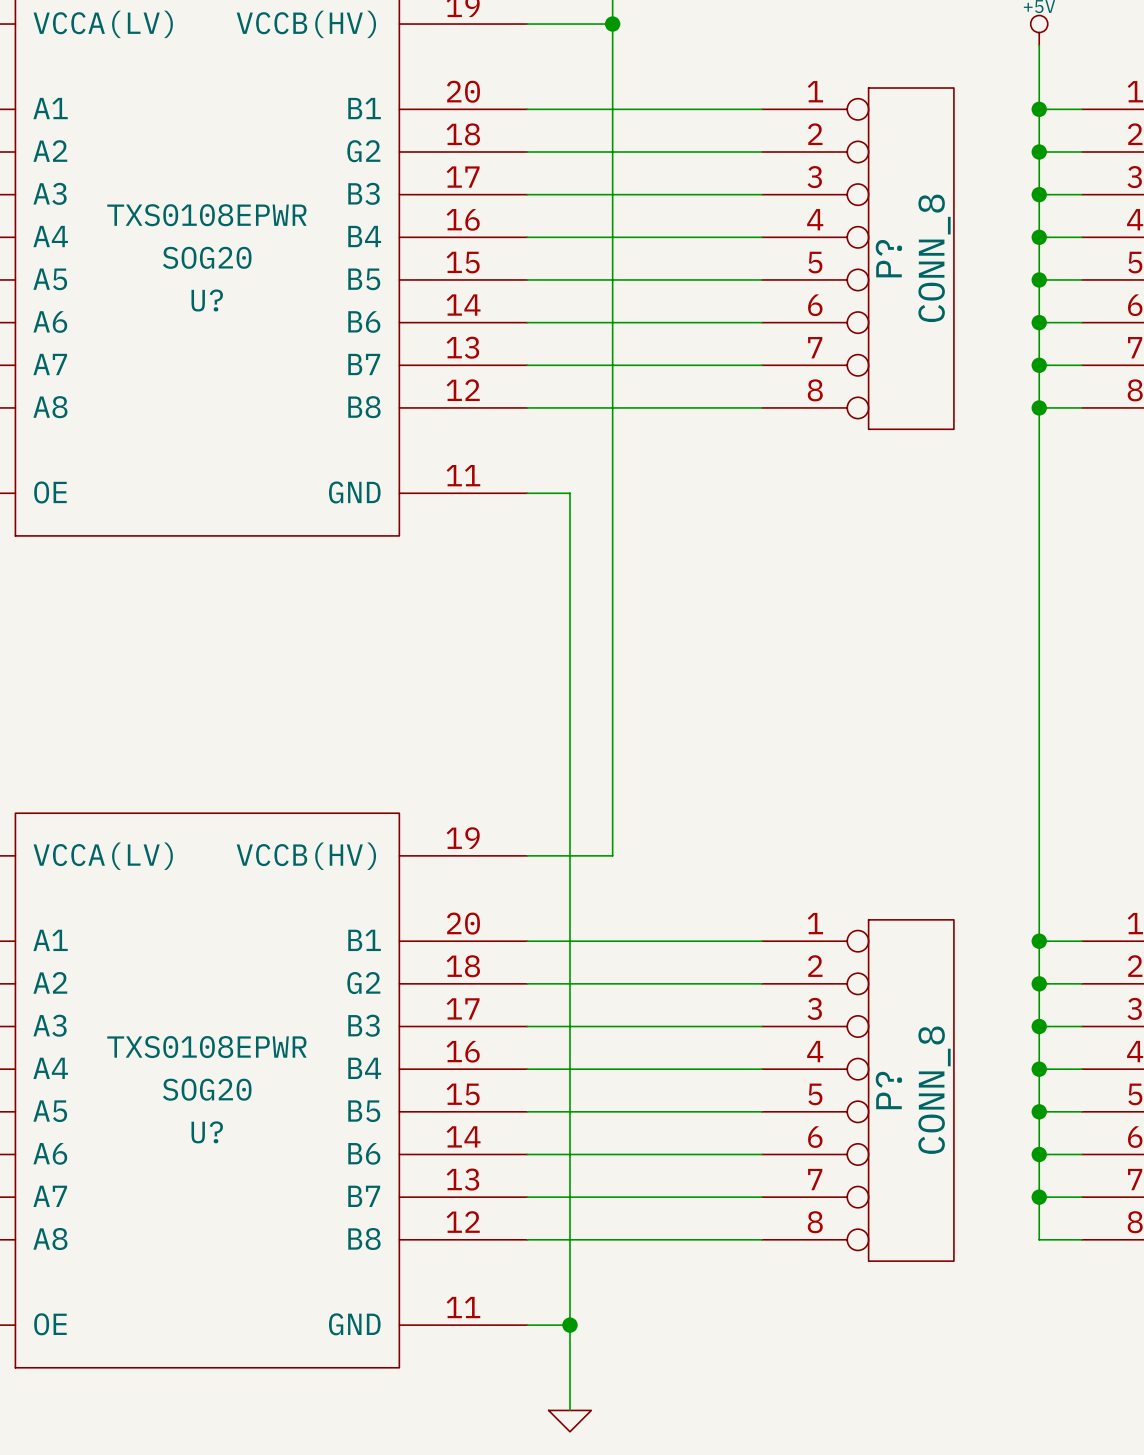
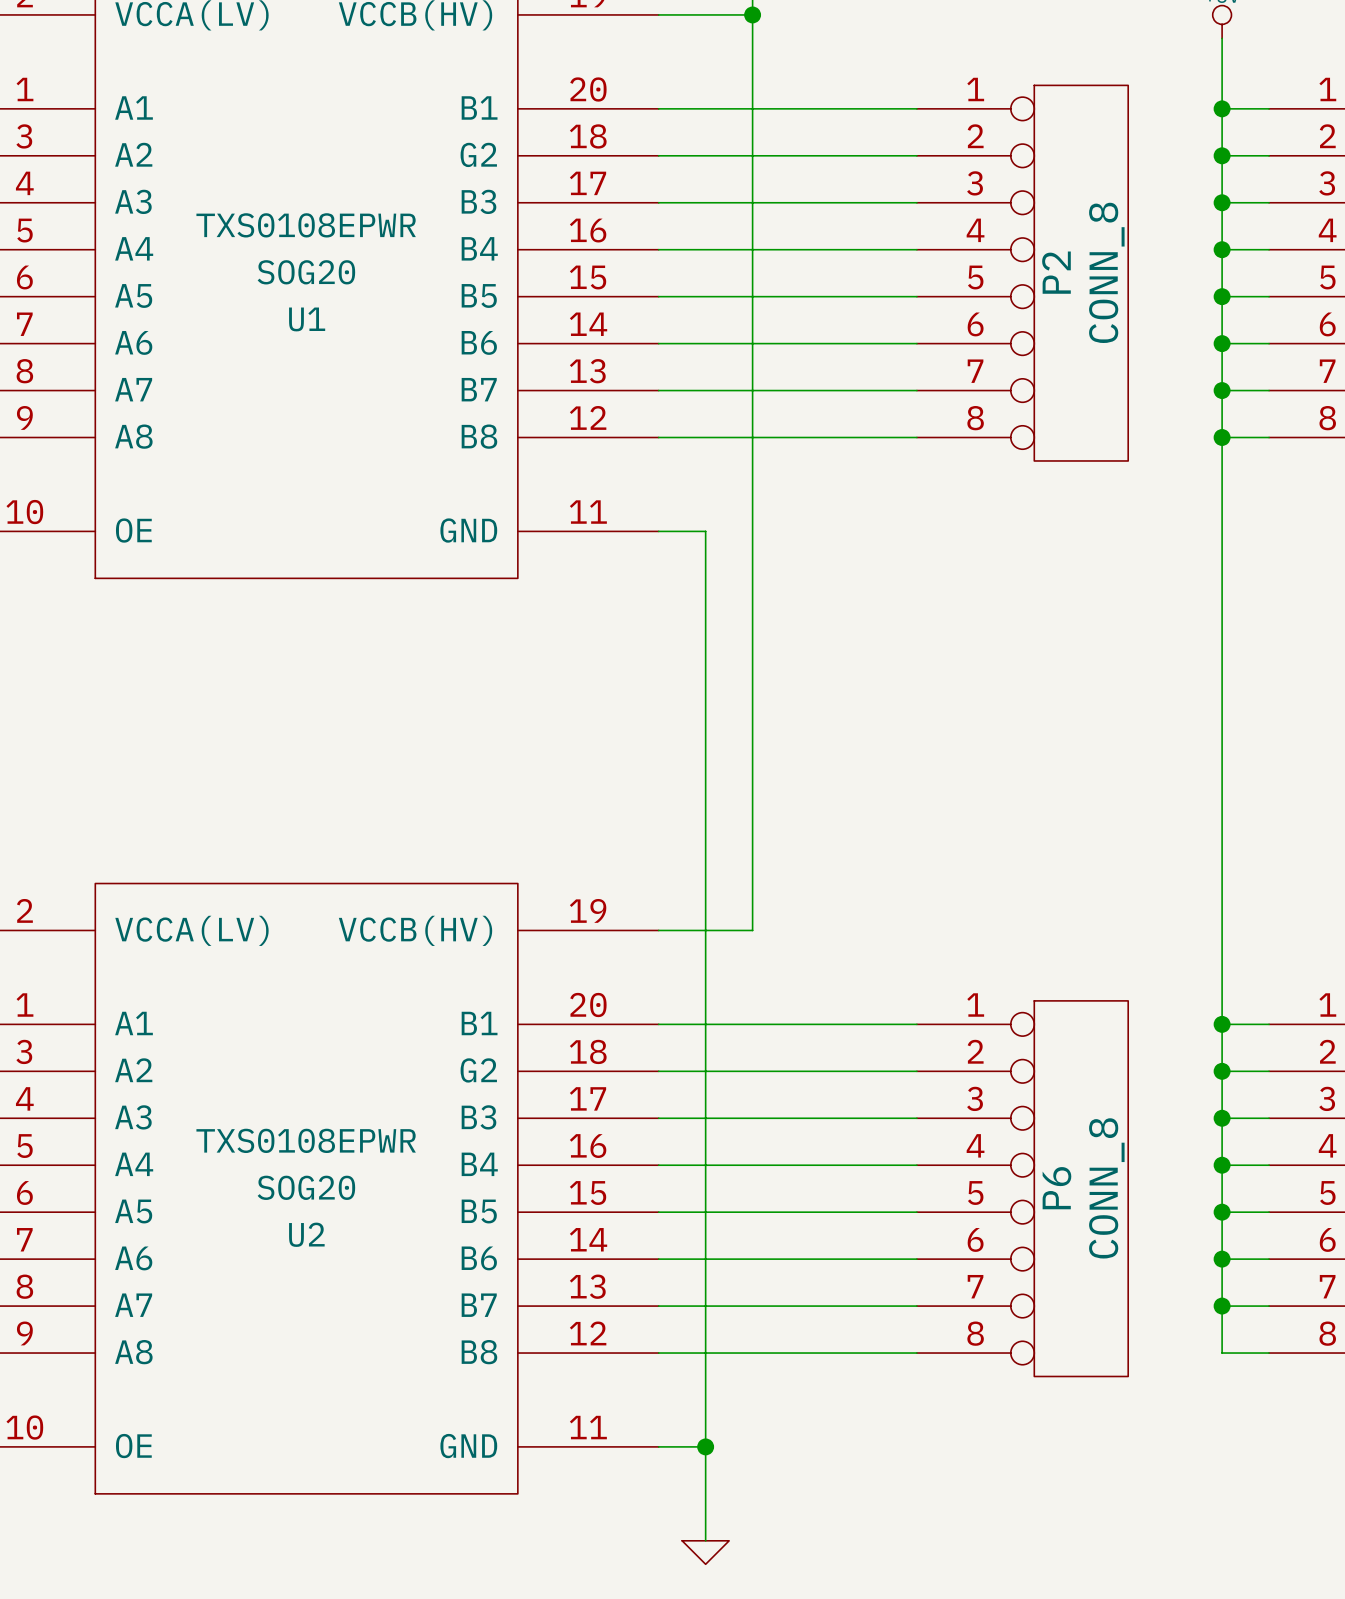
P? name: P? (888, 258) -> P2 (1056, 272)
U? name: U? (207, 300) -> U1 (307, 319)
P? name: P? (888, 1090) -> P6 (1056, 1188)
U? name: U? (207, 1132) -> U2 (306, 1234)

